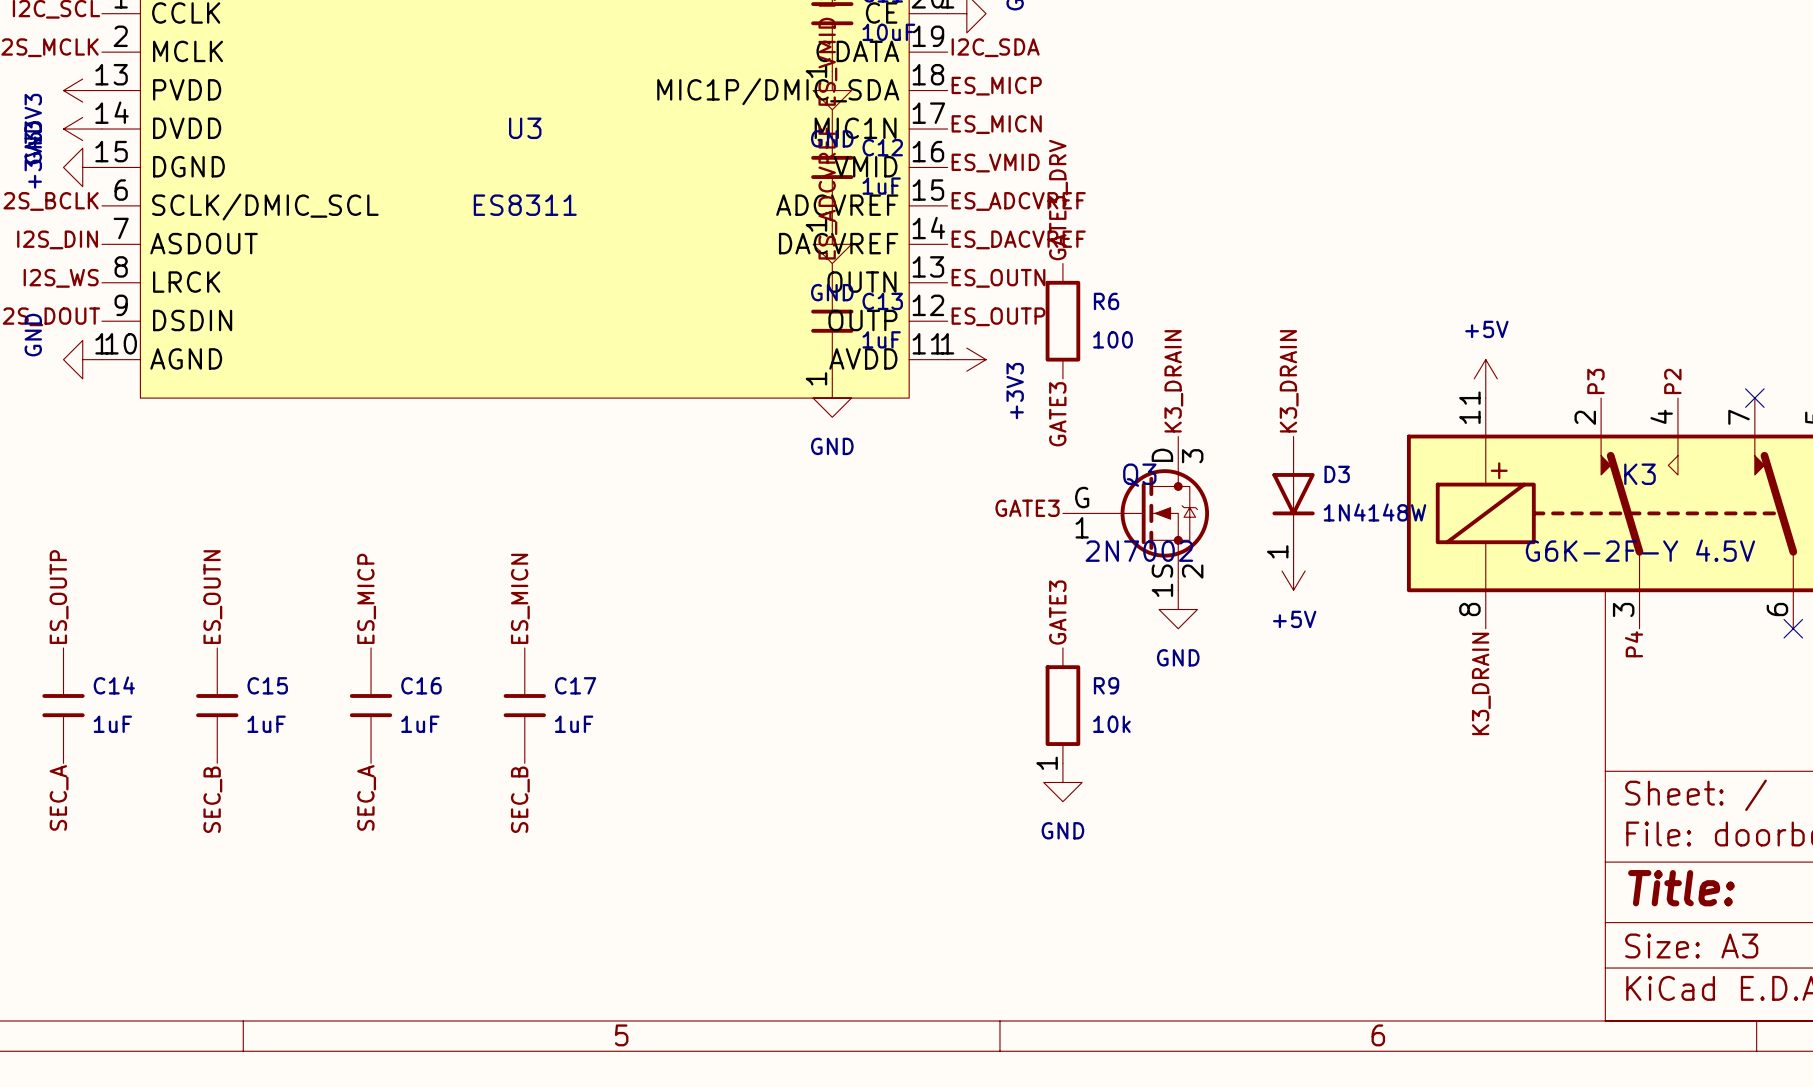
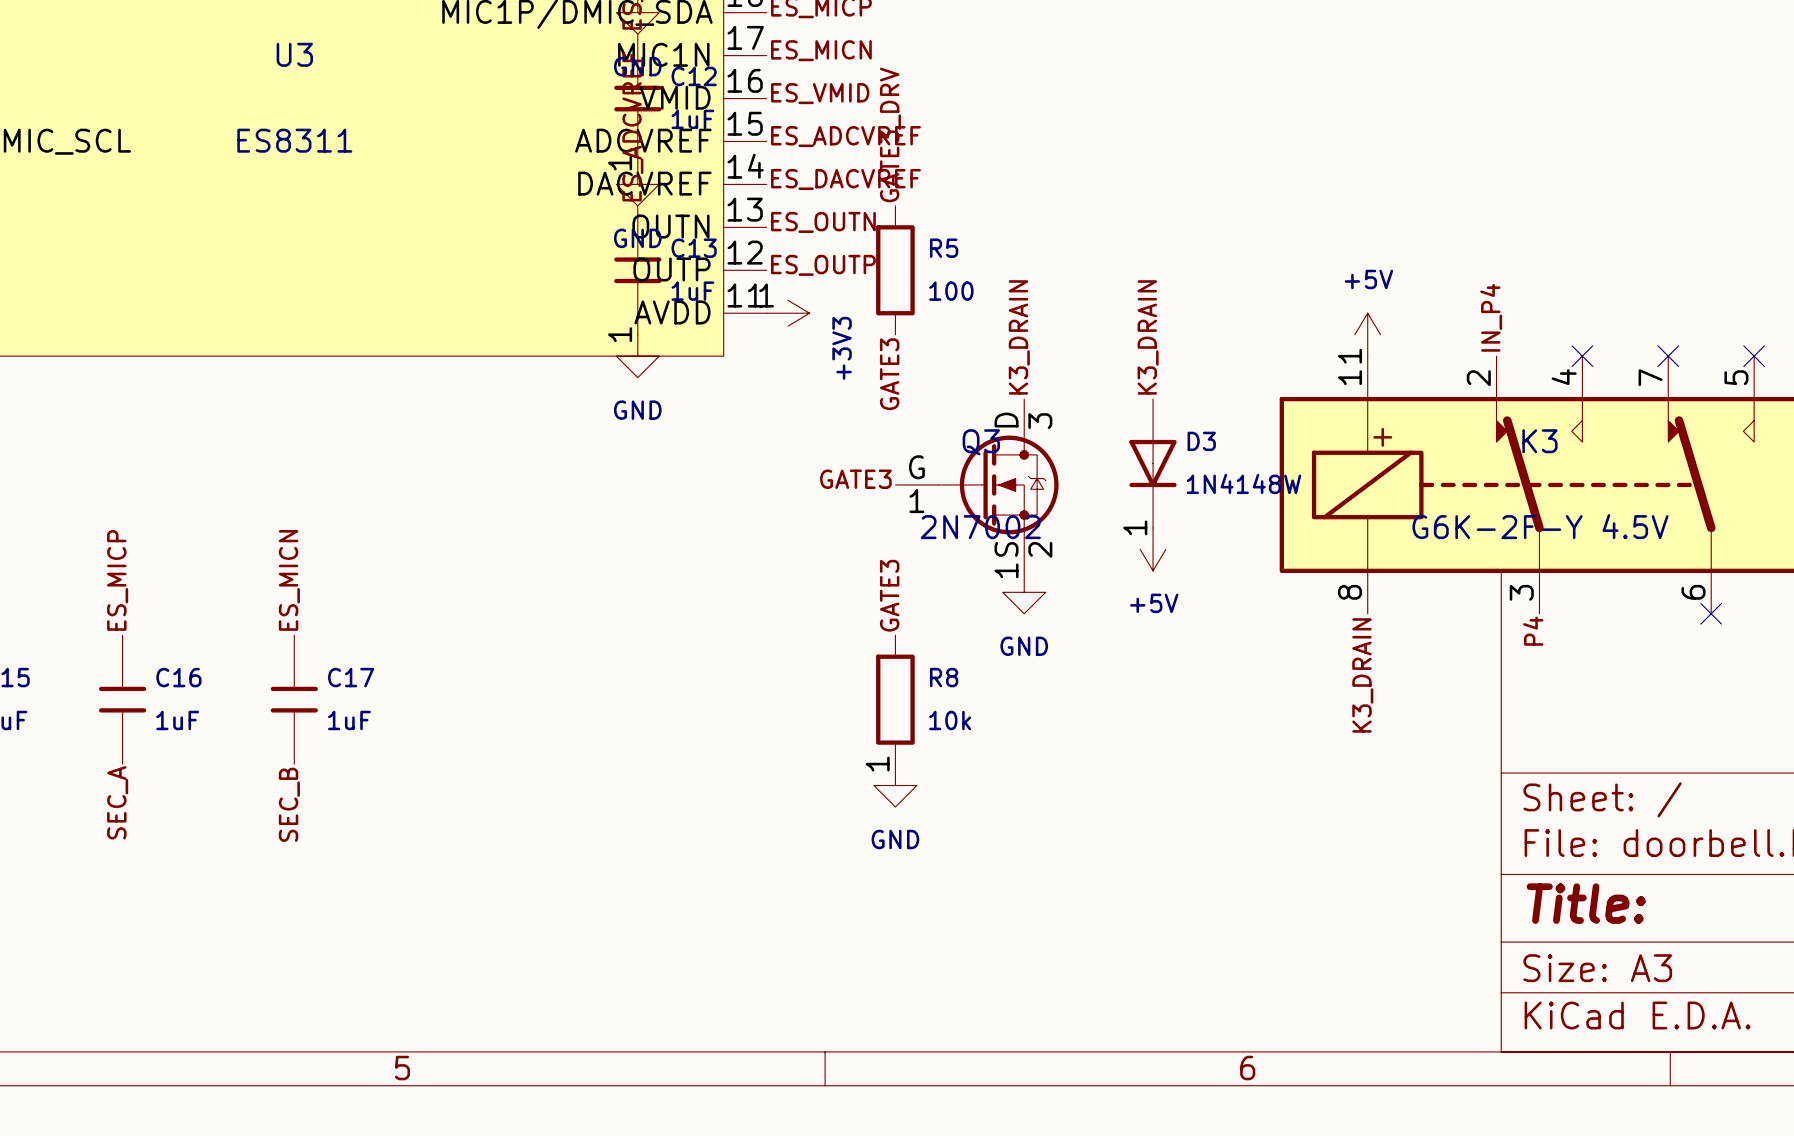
R6 name: R6 (1106, 301) -> R5 (944, 248)
label: P3 (1595, 381) -> IN_P4 (1491, 317)
label: P2 (1672, 381) -> none
no-connect mark: none -> (1582, 356)
R9 name: R9 (1106, 685) -> R8 (944, 677)

